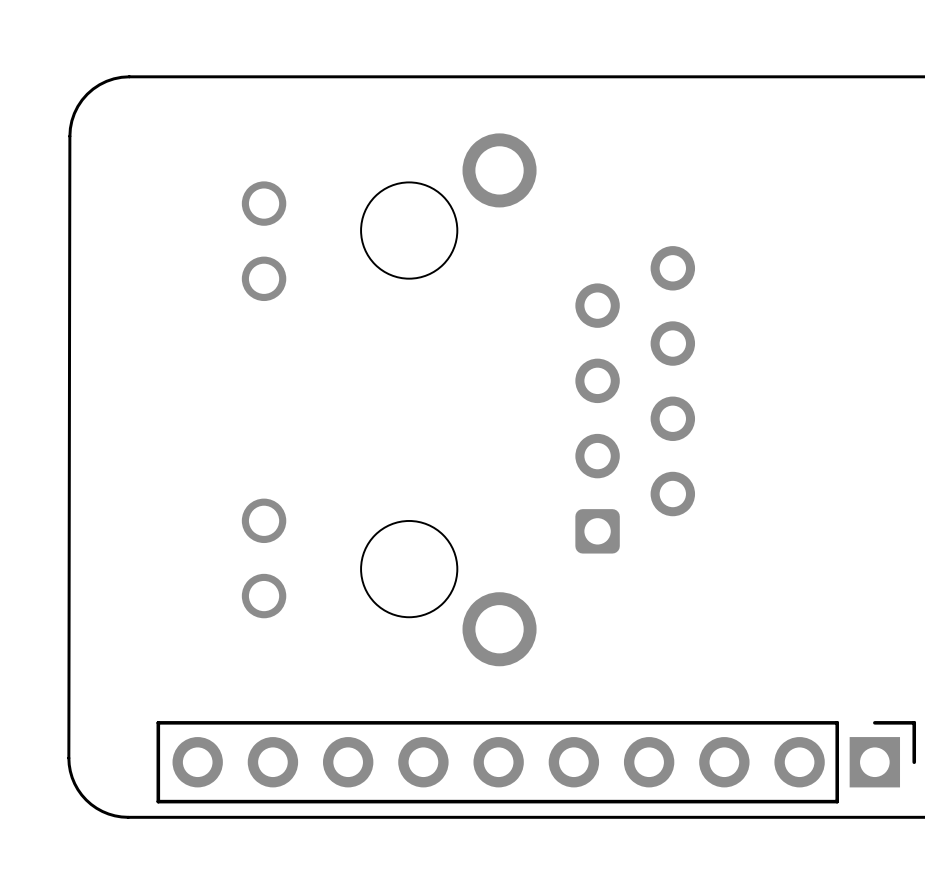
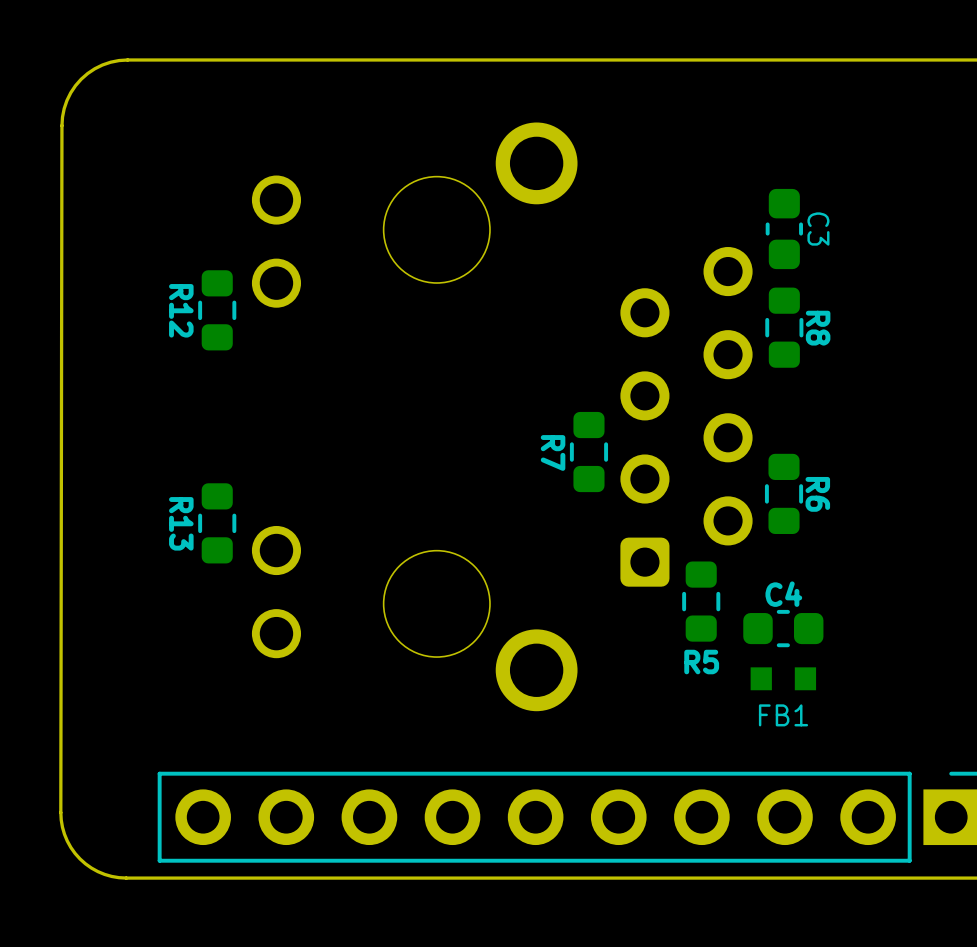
C3: none -> (784, 229)
R12: none -> (217, 310)
R8: none -> (784, 327)
R7: none -> (588, 452)
R6: none -> (784, 493)
R13: none -> (217, 523)
R5: none -> (701, 601)
C4: none -> (783, 628)
FB1: none -> (783, 678)

